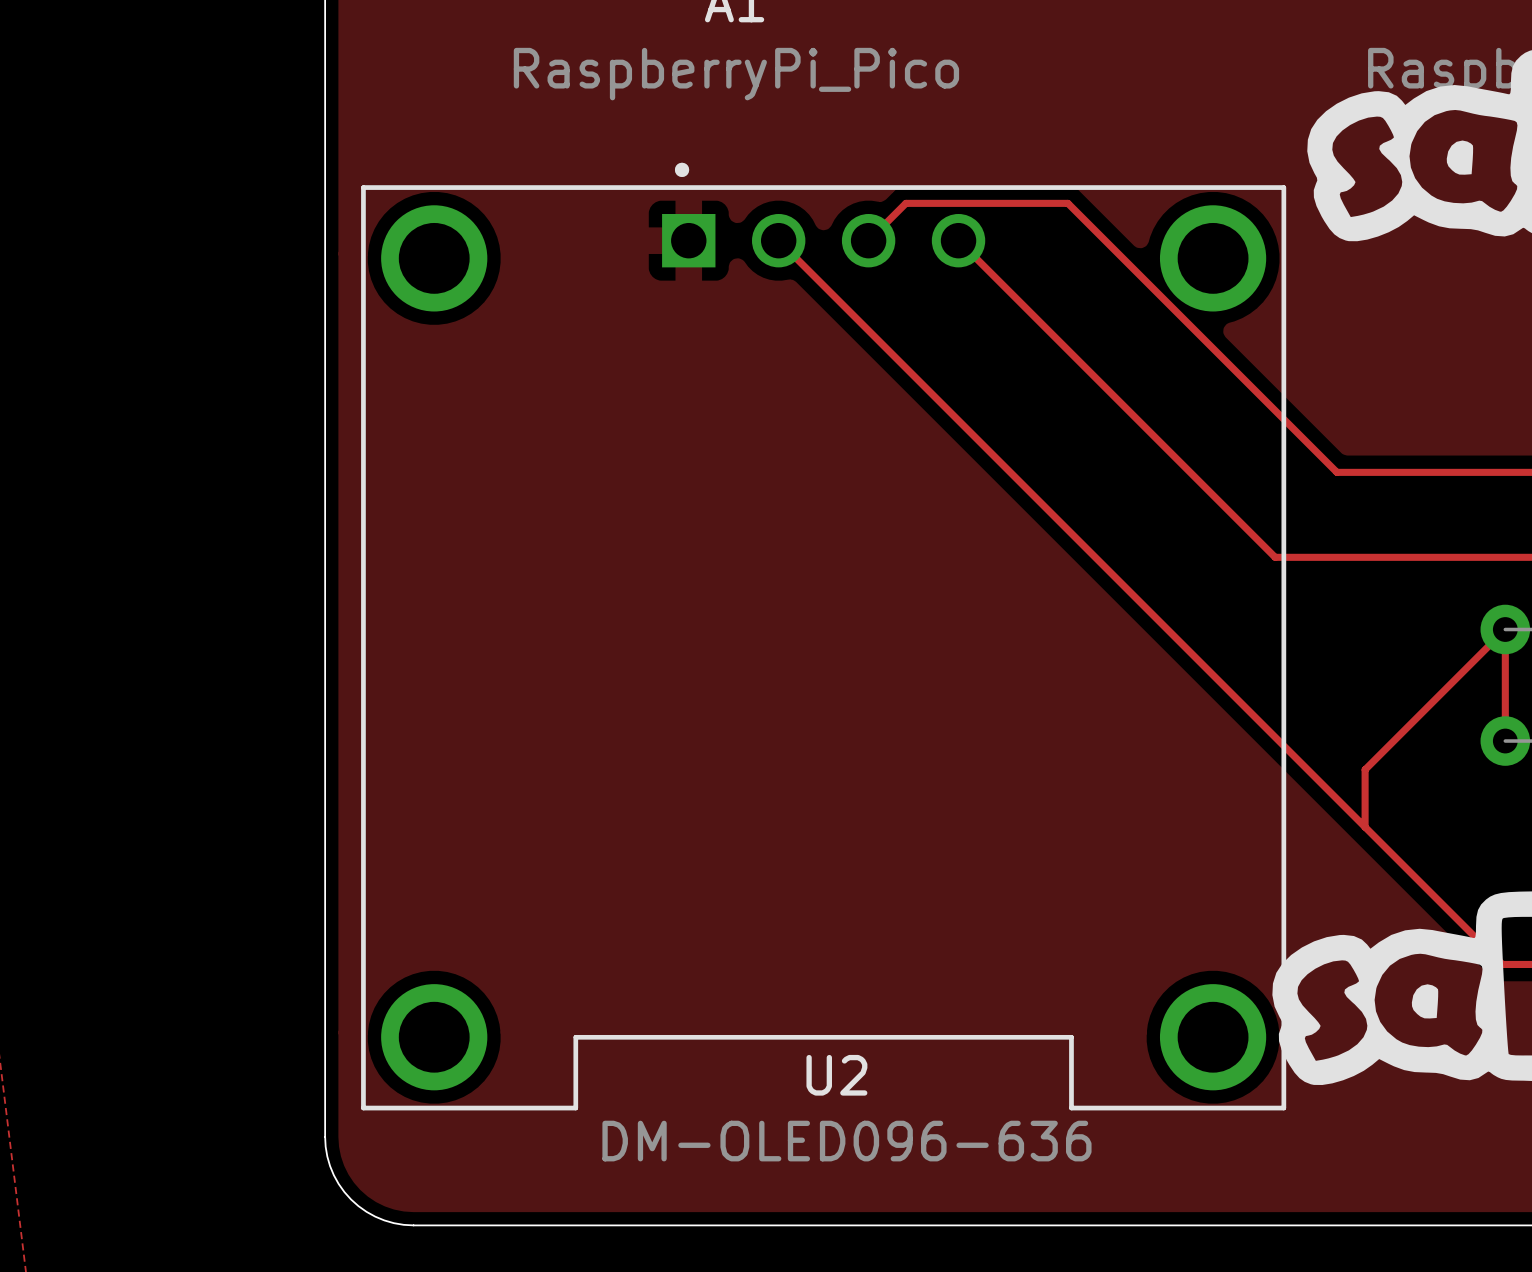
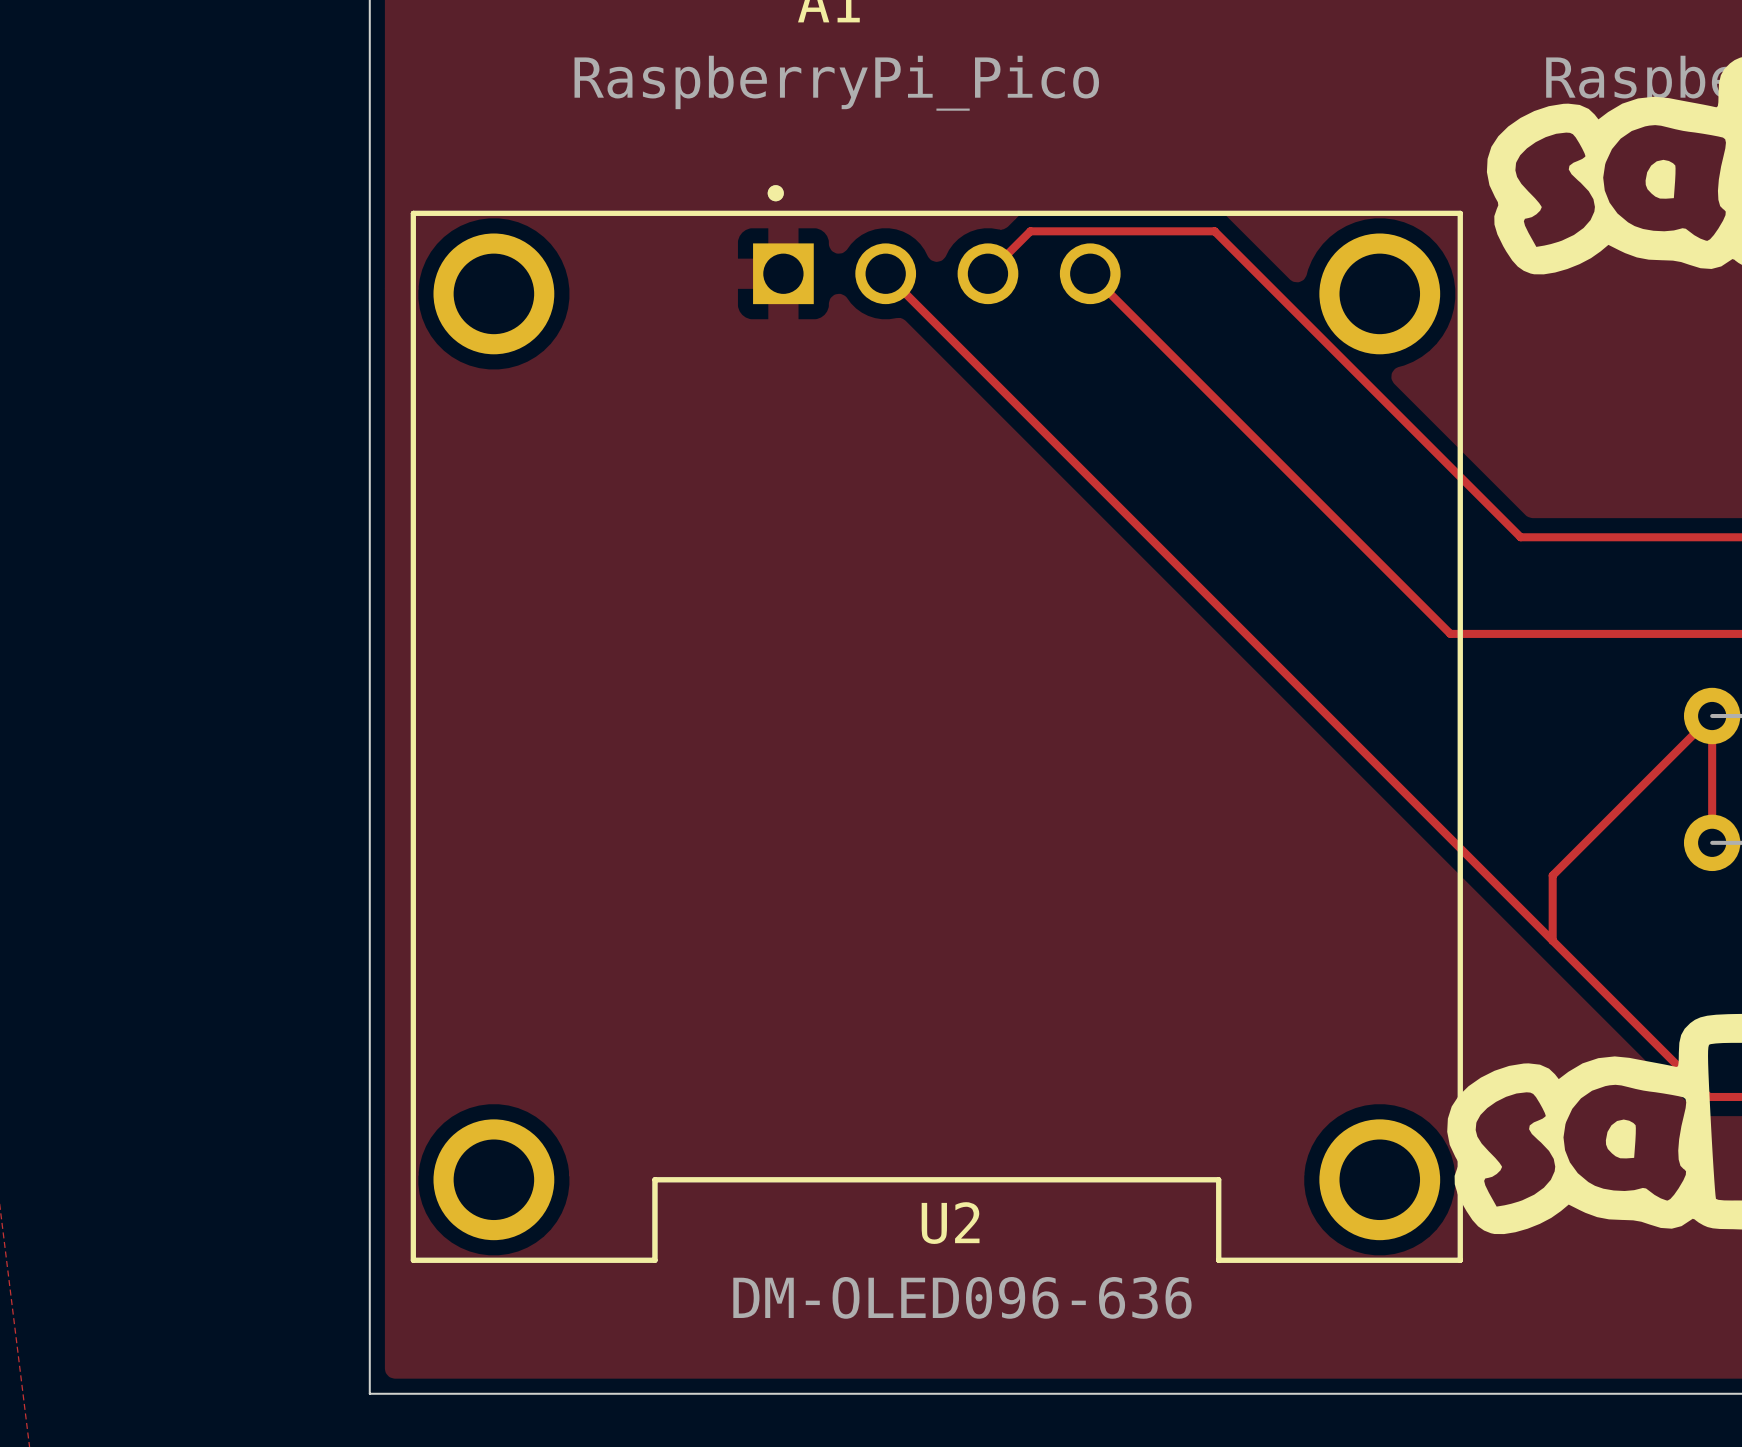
board edge: (325, 1136) (330, 1166) (338, 1183) (351, 1199) (366, 1211) (384, 1220) (413, 1225) -> (369, 1293) (369, 1393) (470, 1393)

